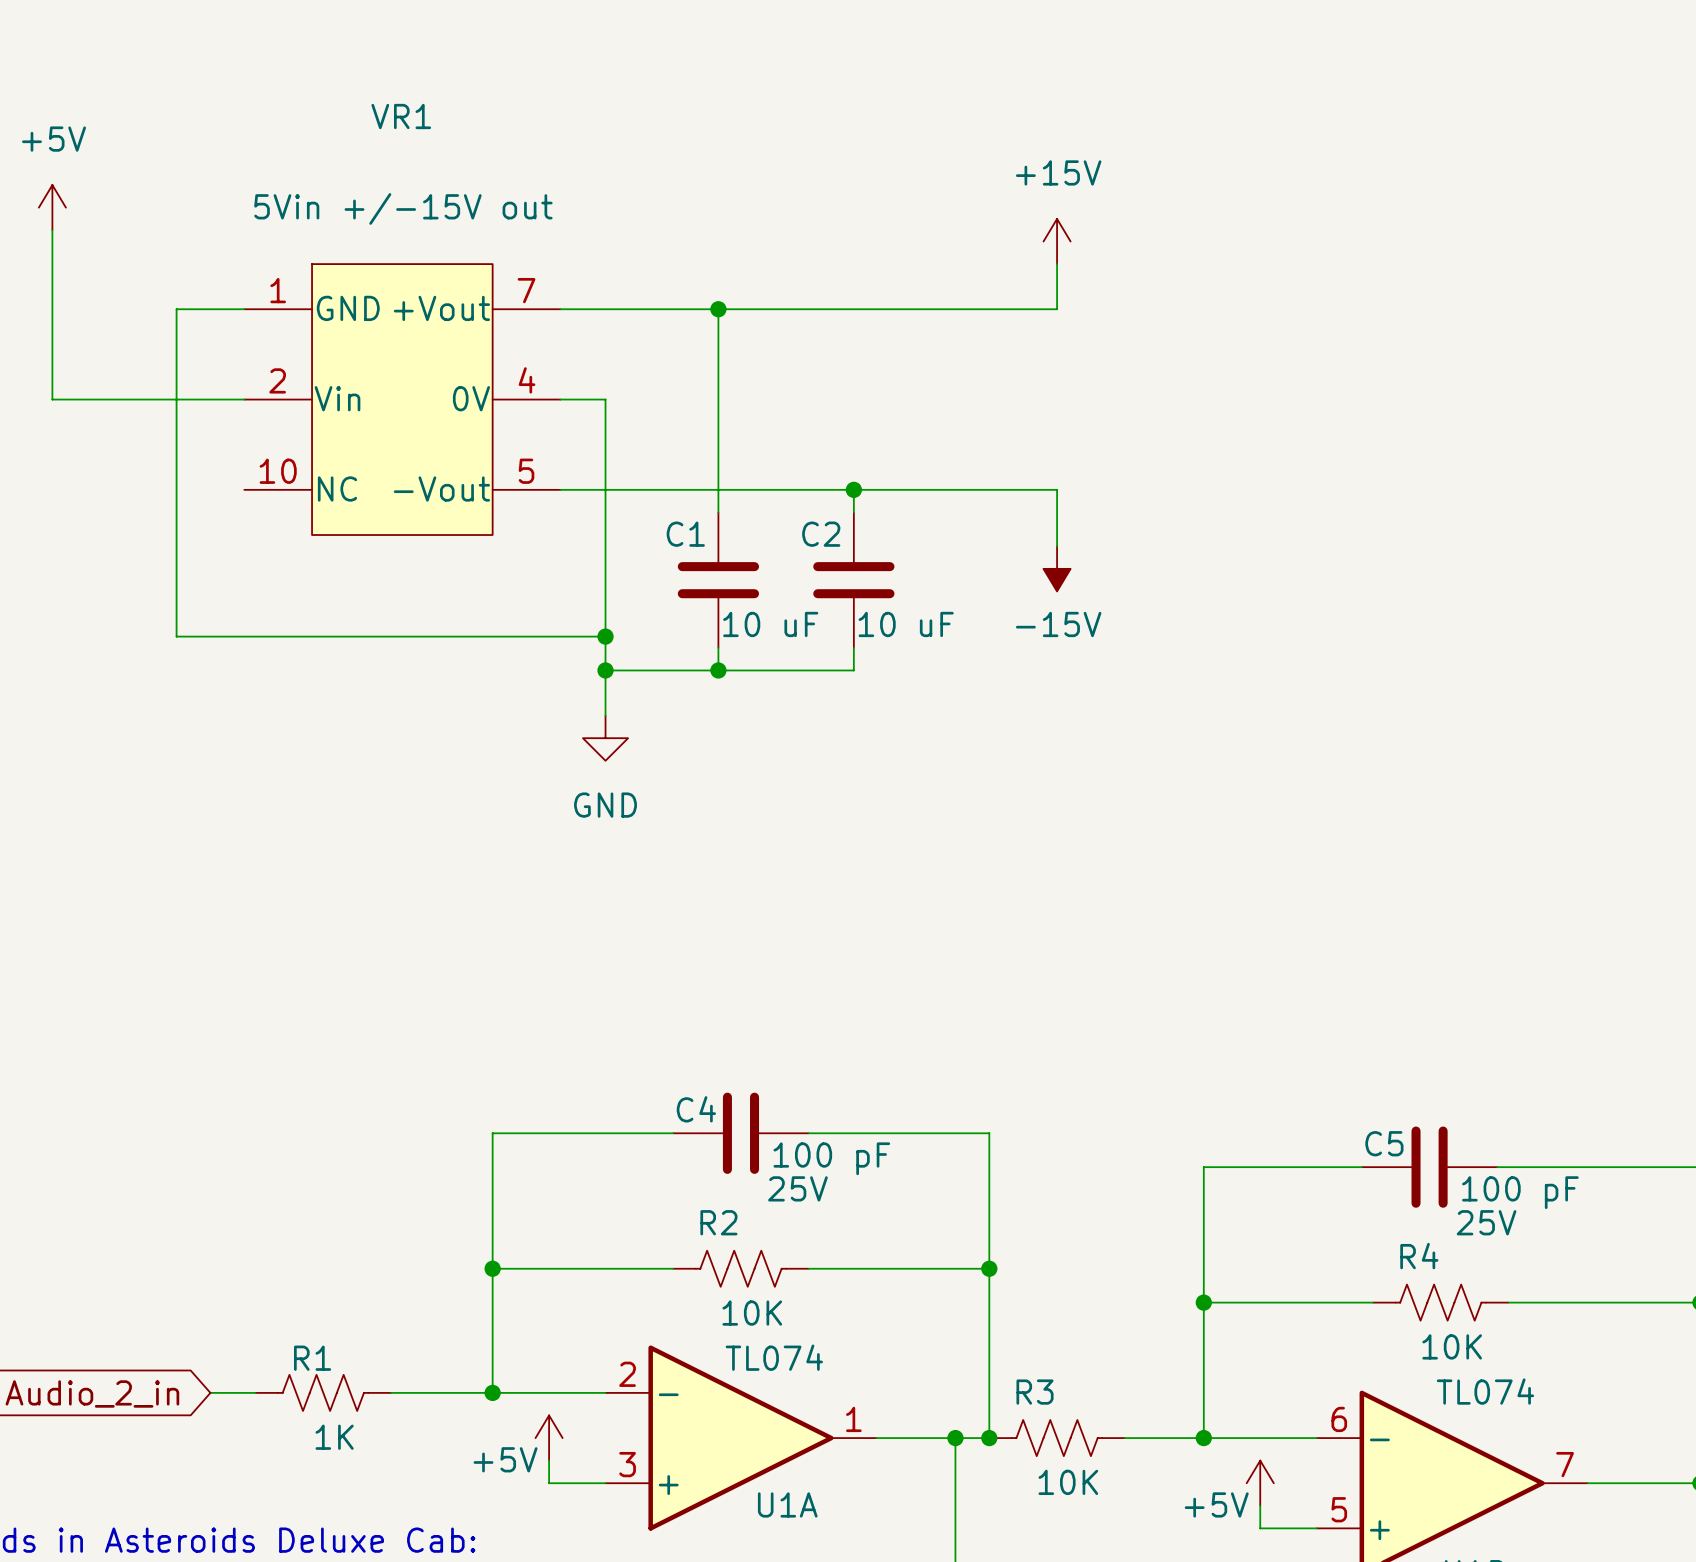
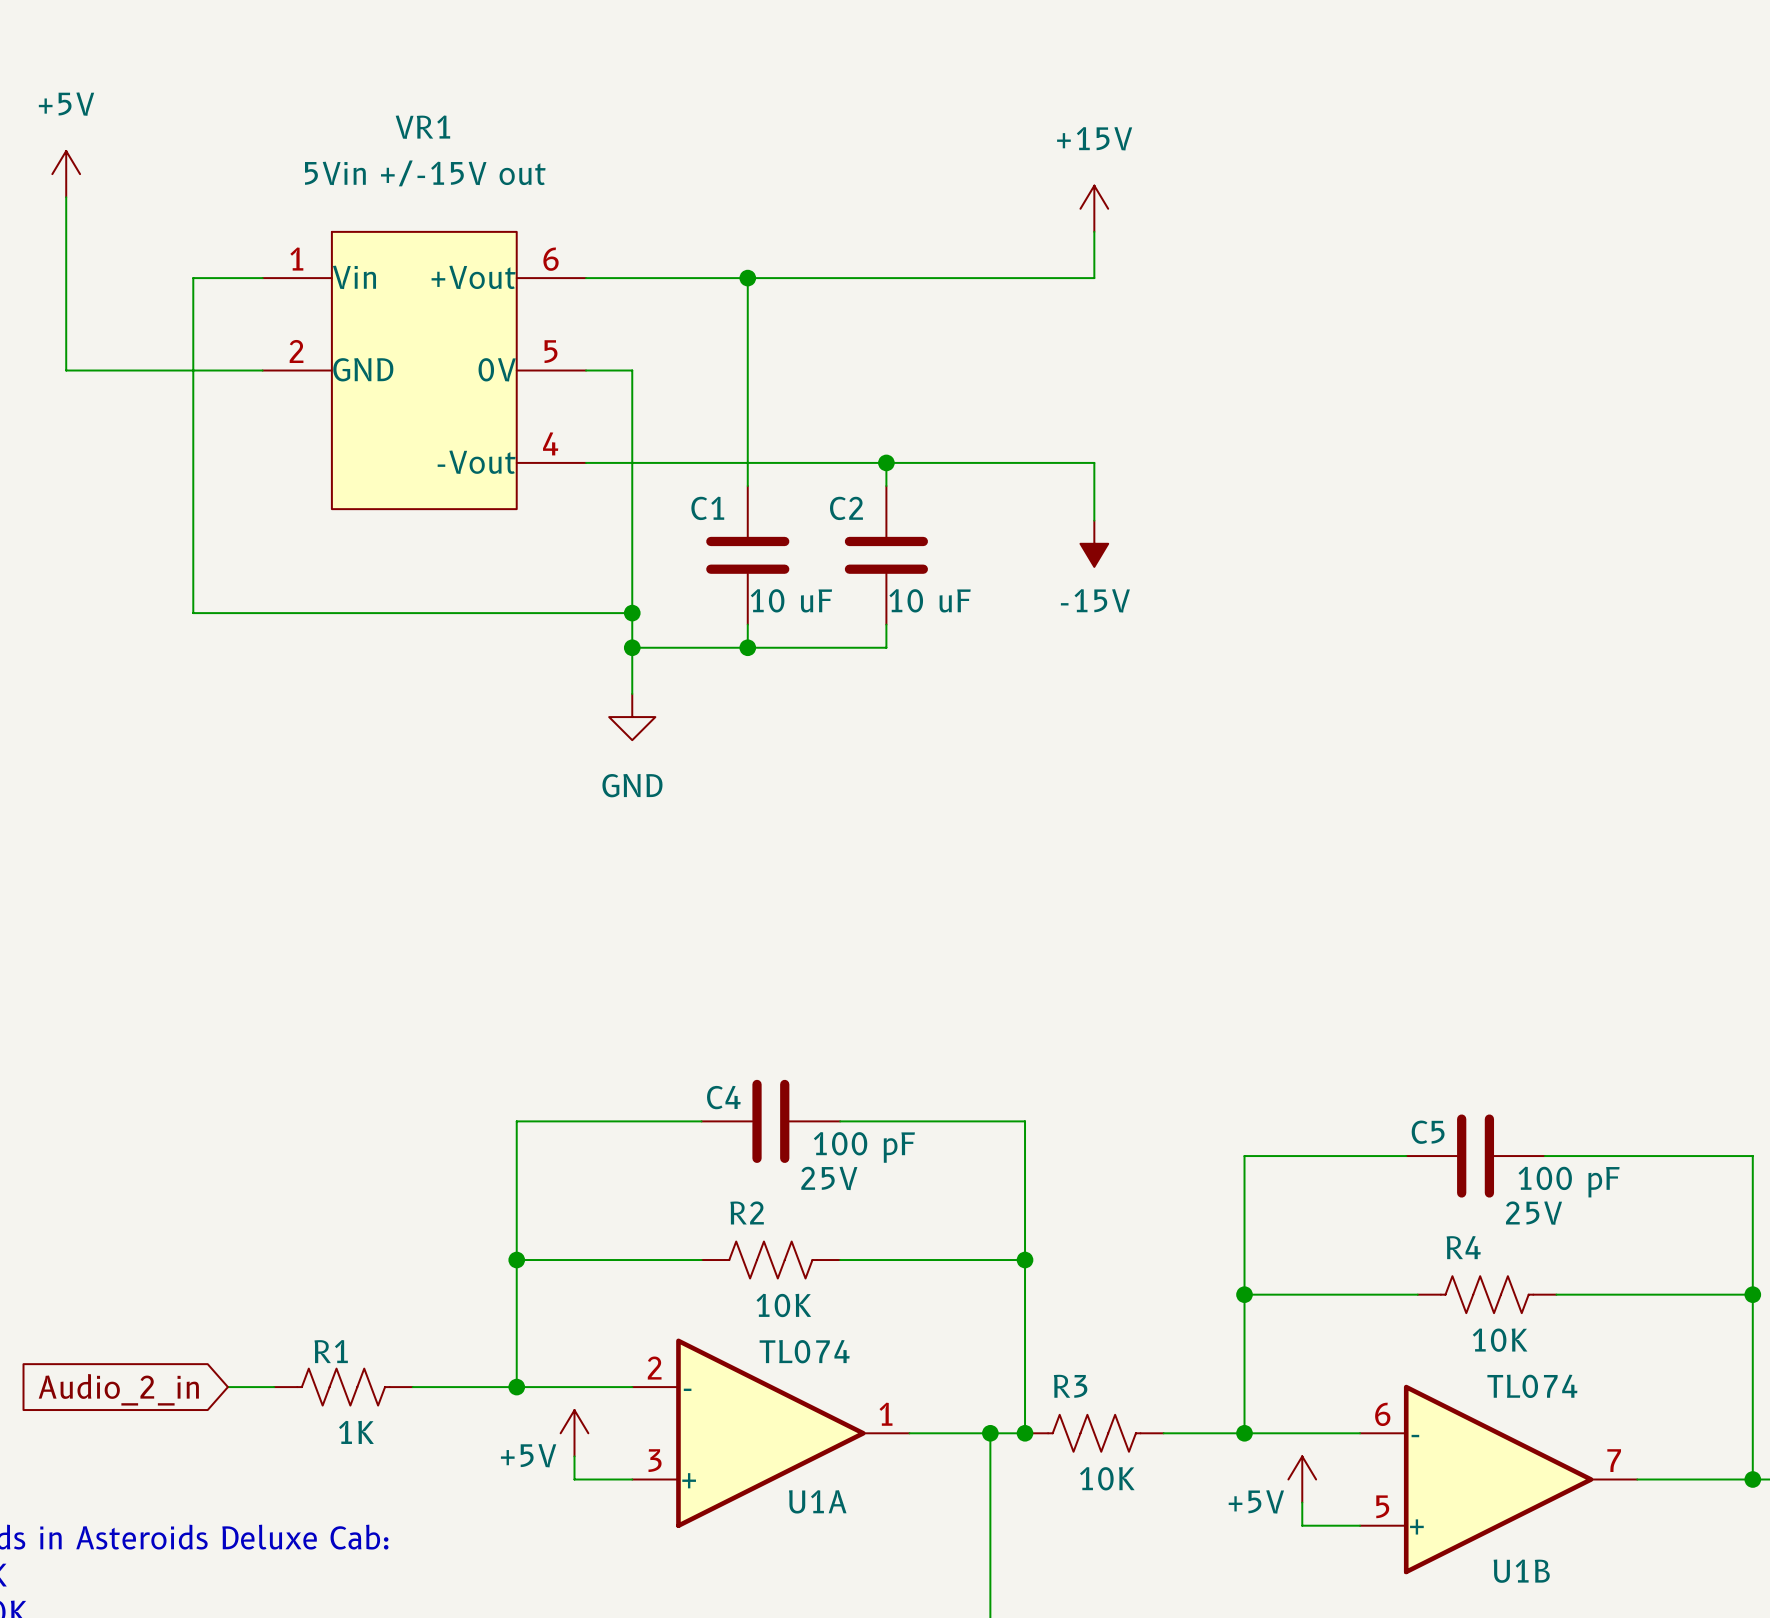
VR1 name position: VR1 (401, 116) -> VR1 (422, 127)
VR1 symbol: [244, 264, 561, 536] -> [262, 231, 587, 510]

